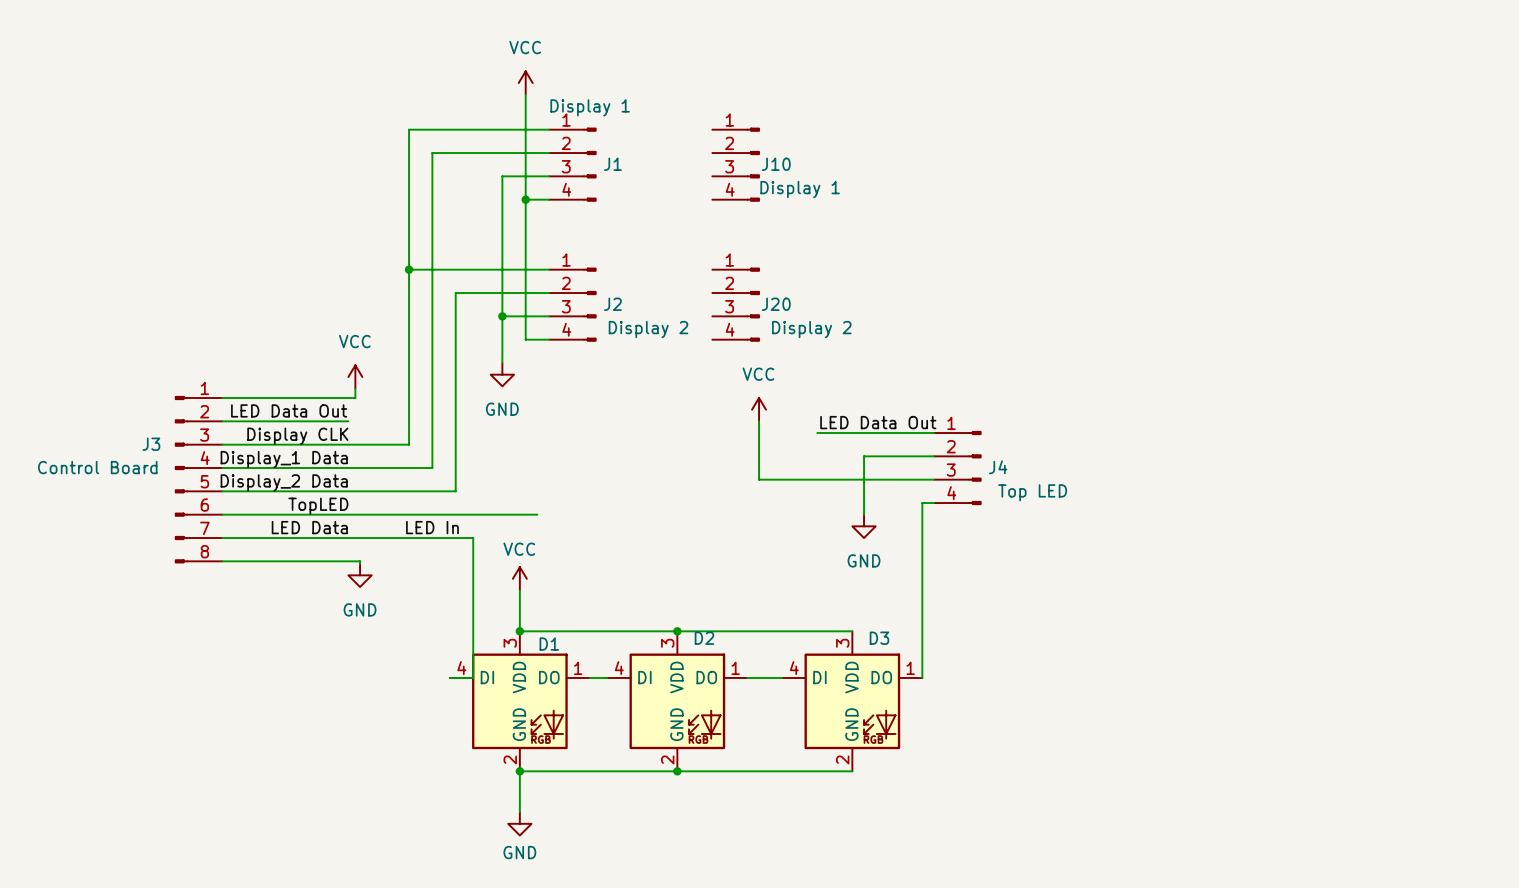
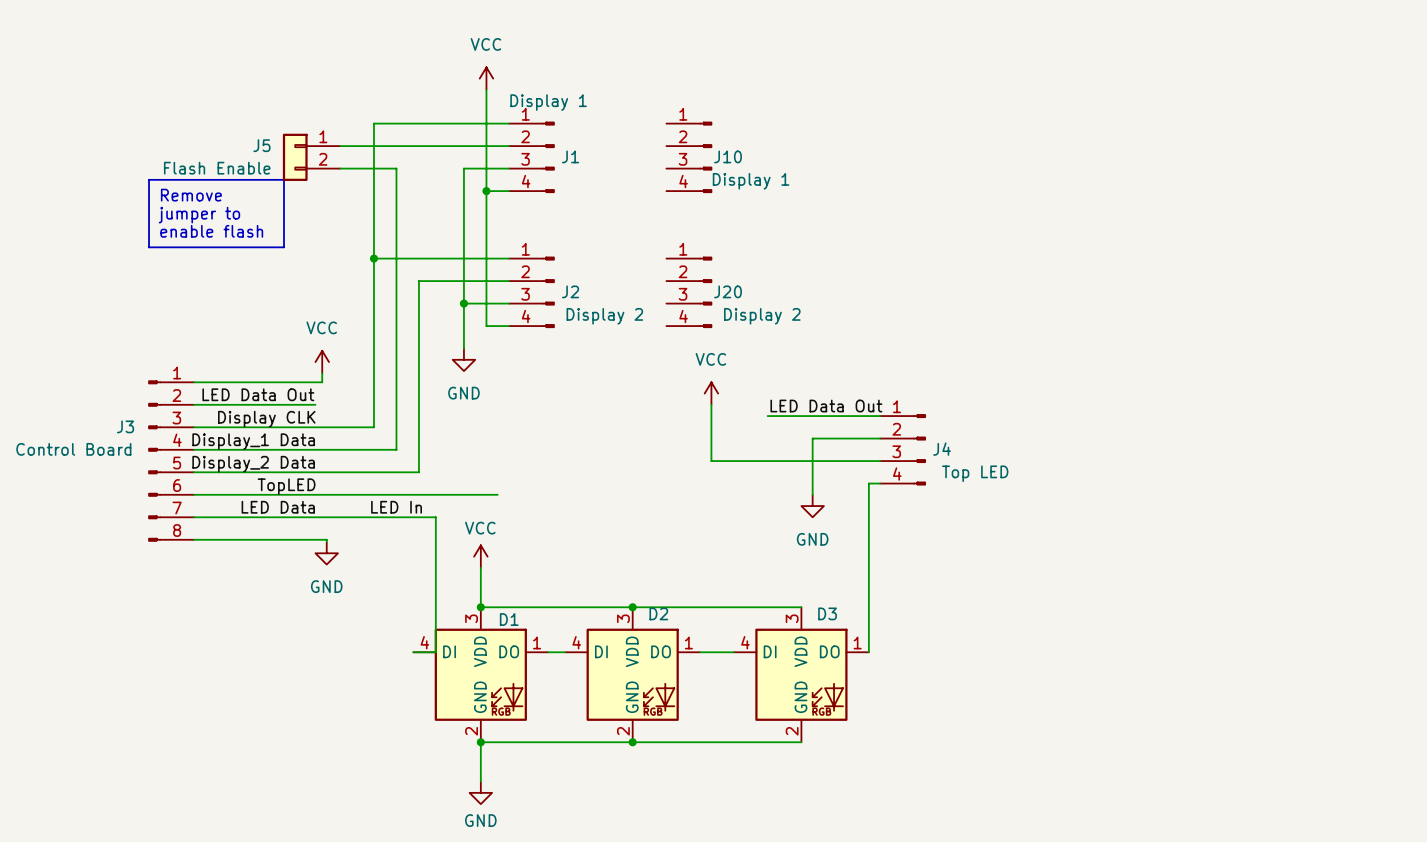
wire: (432, 153) (432, 176) -> (396, 146) (340, 146)
J5: none -> Flash Enable (311, 157)
wire: none -> (340, 168) (396, 168)
line: none -> (149, 179) (283, 179) (283, 247) (149, 247) (149, 179)
text: none -> Remove (191, 195)
text: none -> jumper to (199, 215)
text: none -> enable flash (211, 231)

